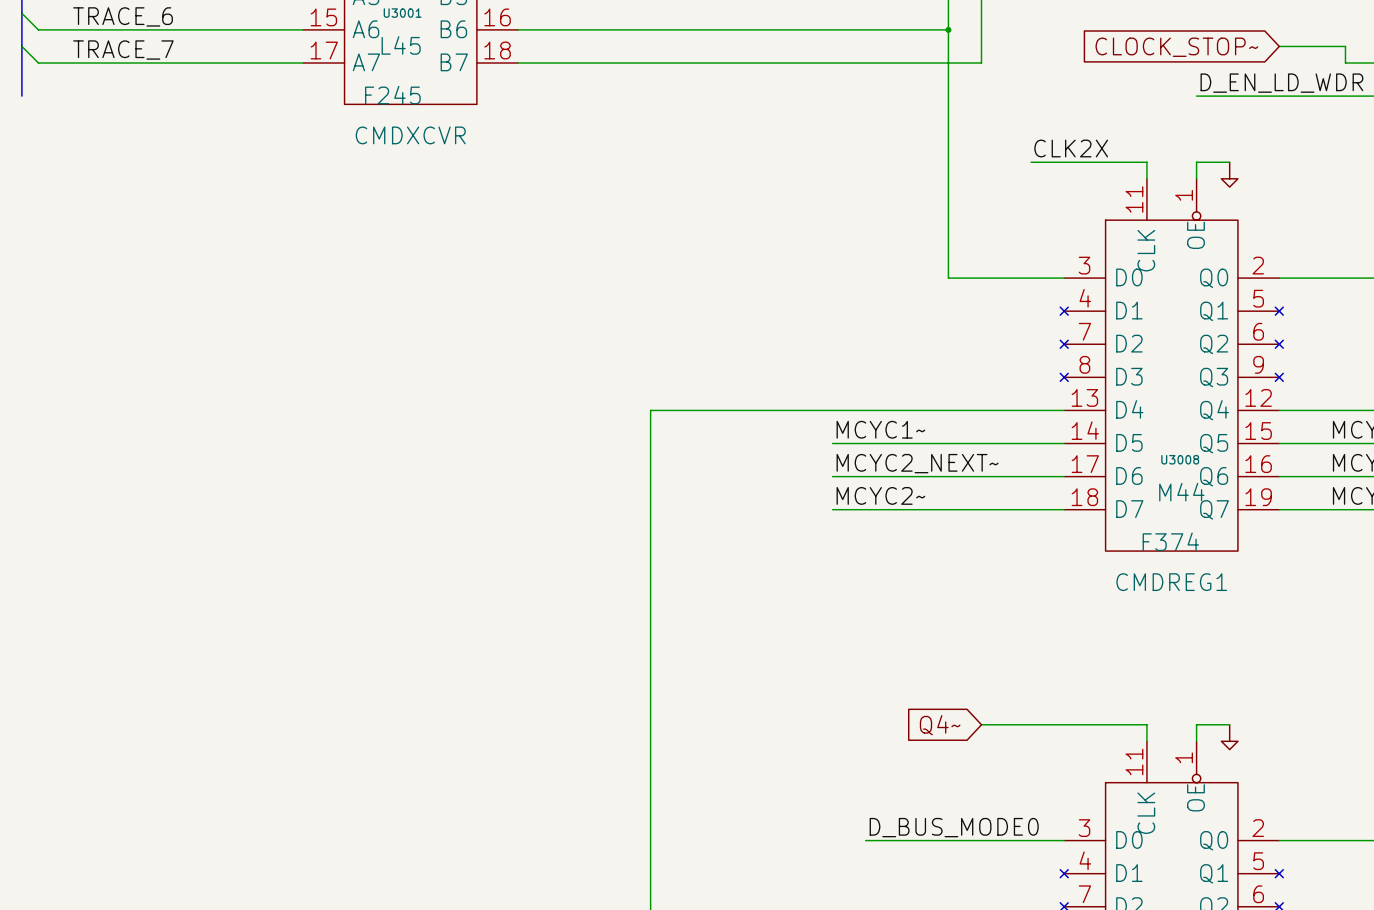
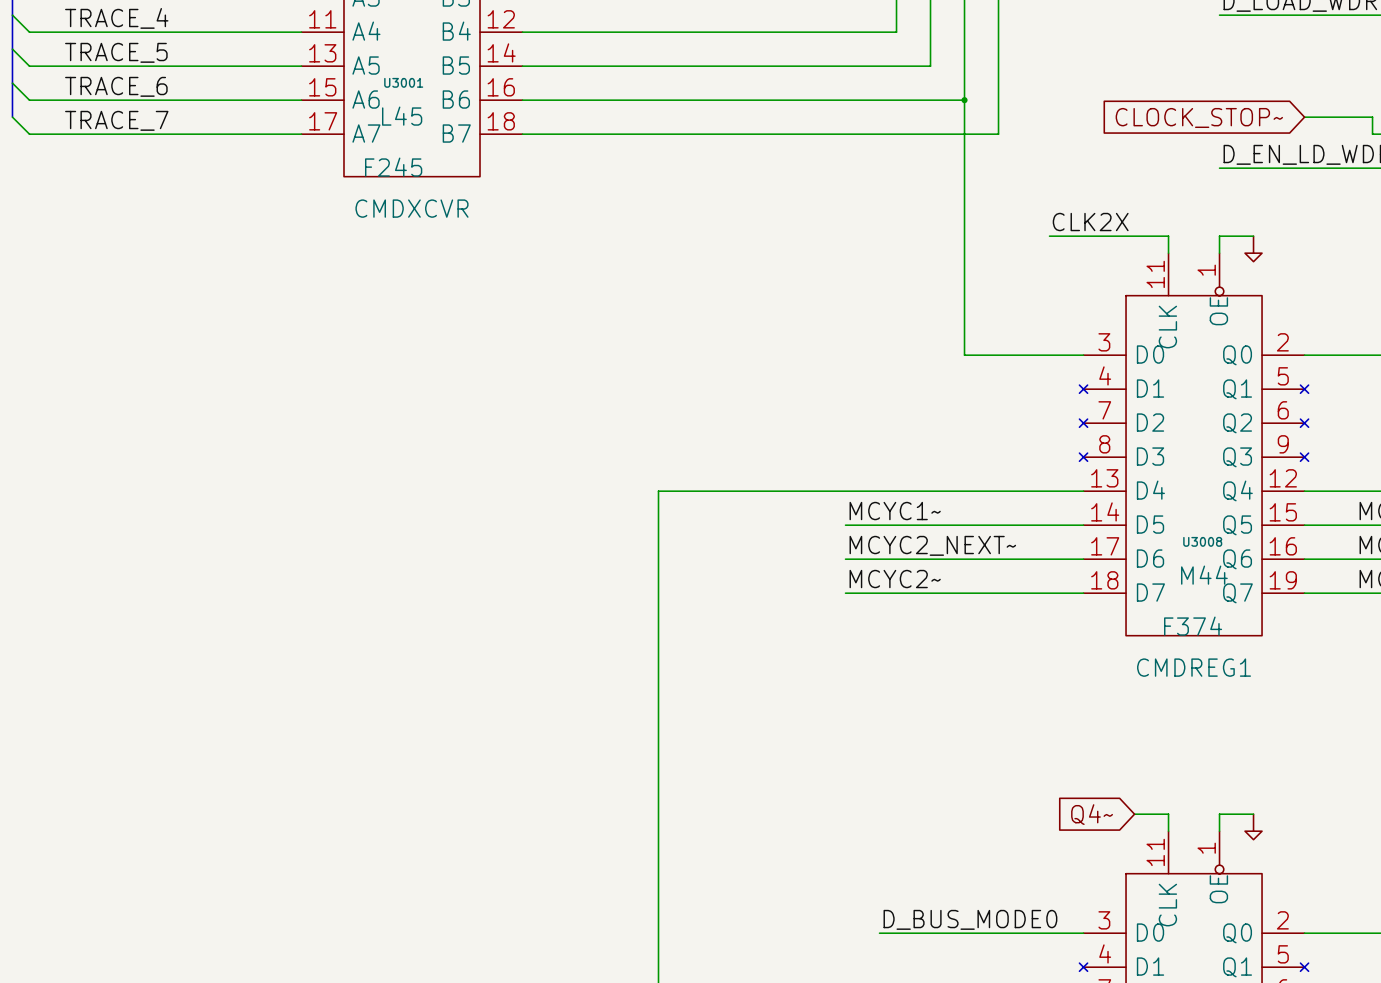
bus: (21, 46) (21, 96) -> none
wire: (981, 724) (1113, 724) -> none
global label position: Q4~ (940, 725) -> Q4~ (1092, 814)

